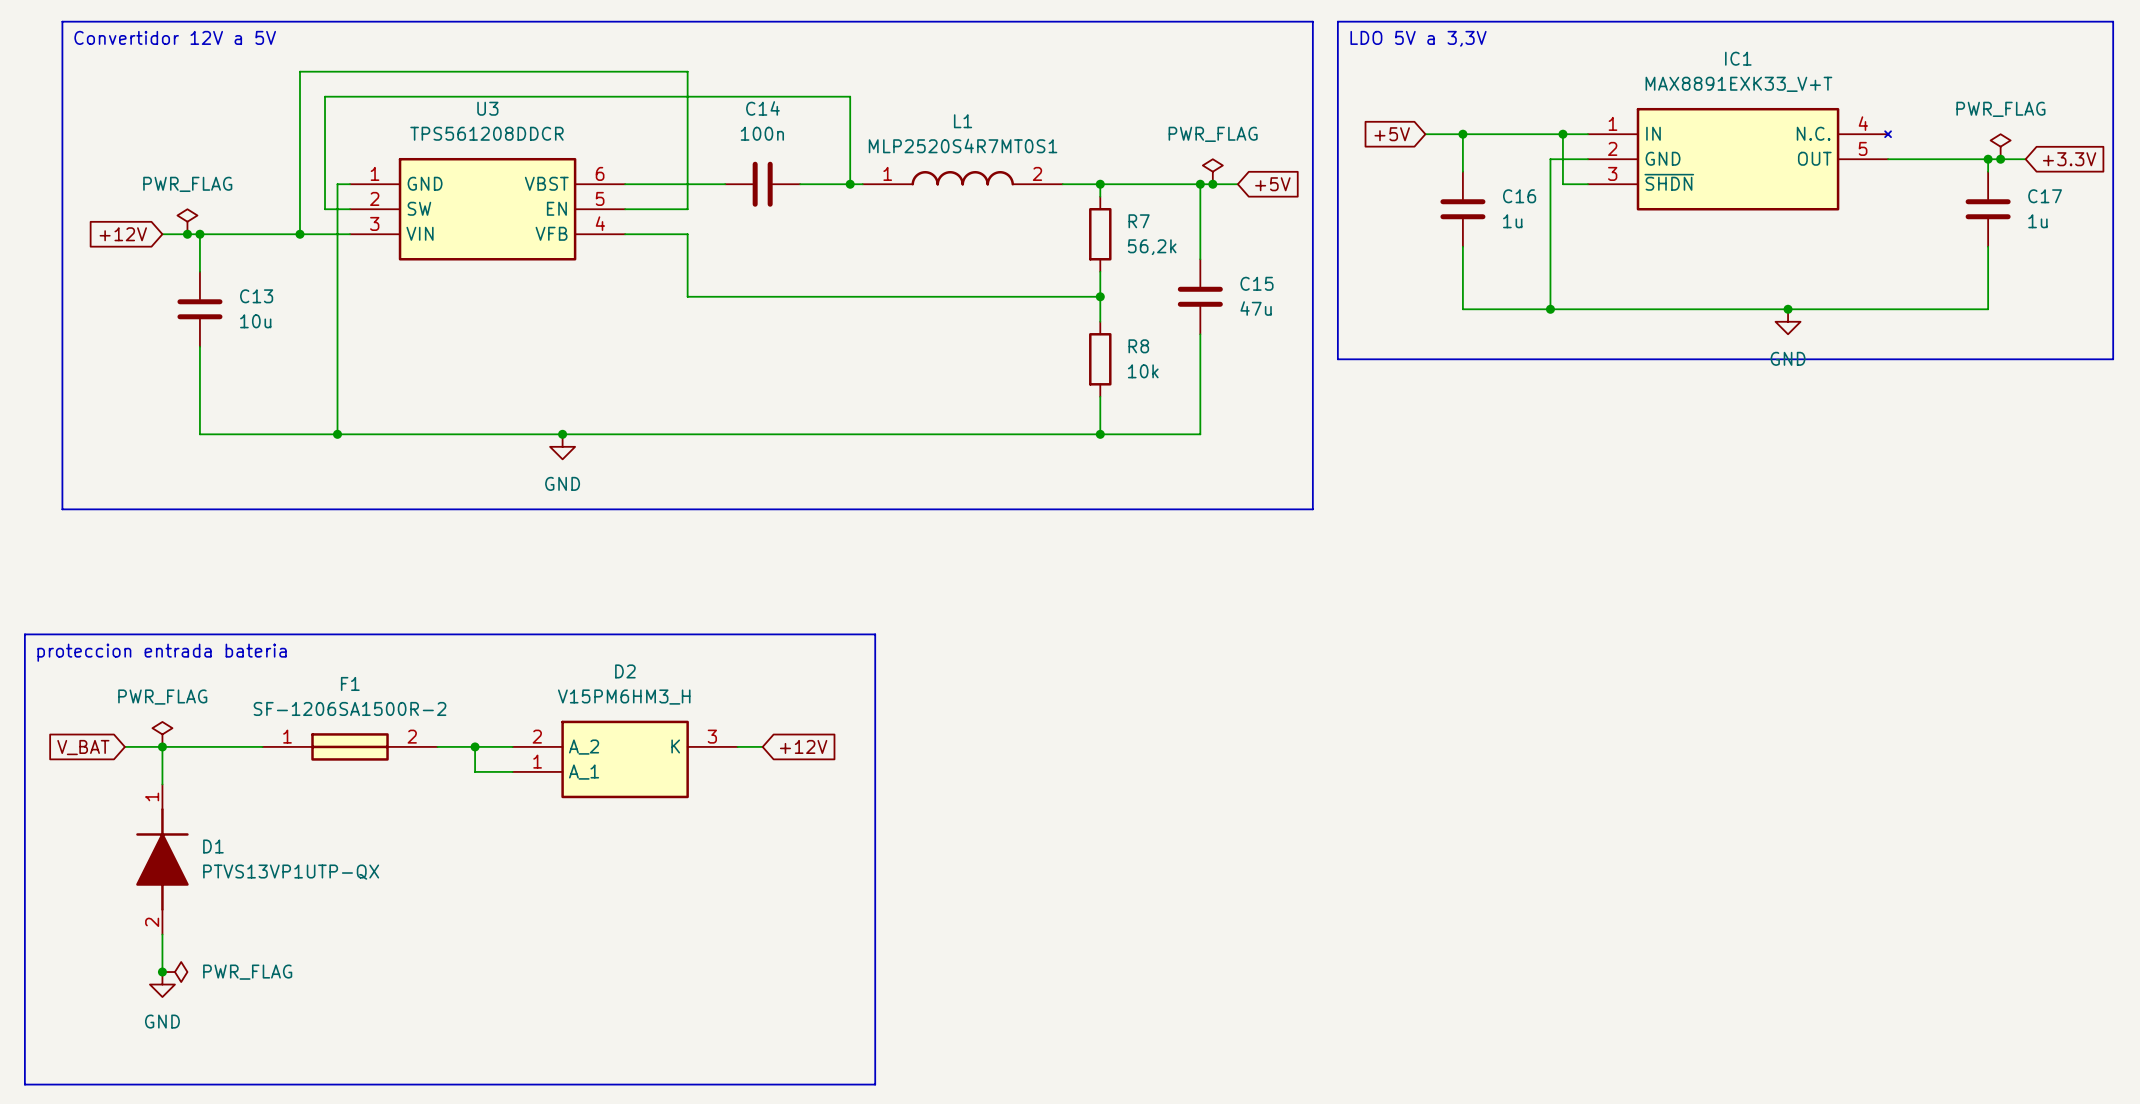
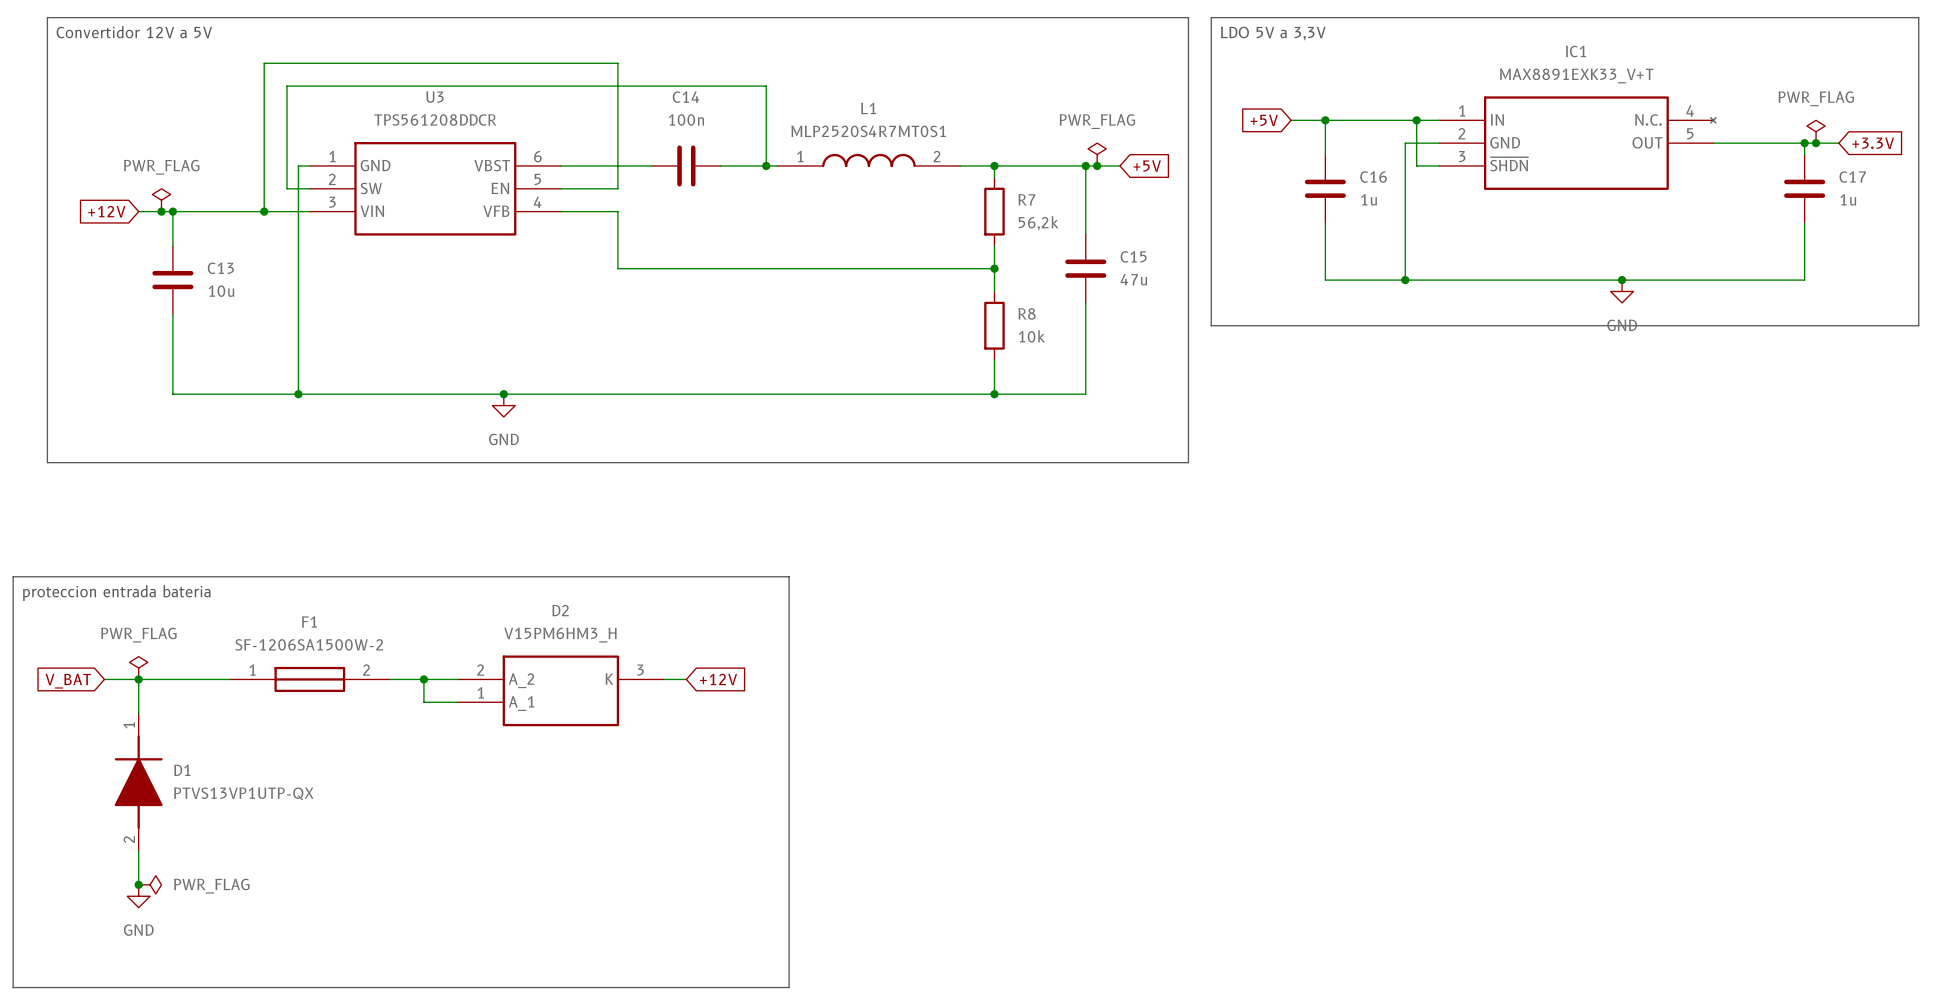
F1 value: SF-1206SA1500R-2 (350, 708) -> SF-1206SA1500W-2 (309, 644)

